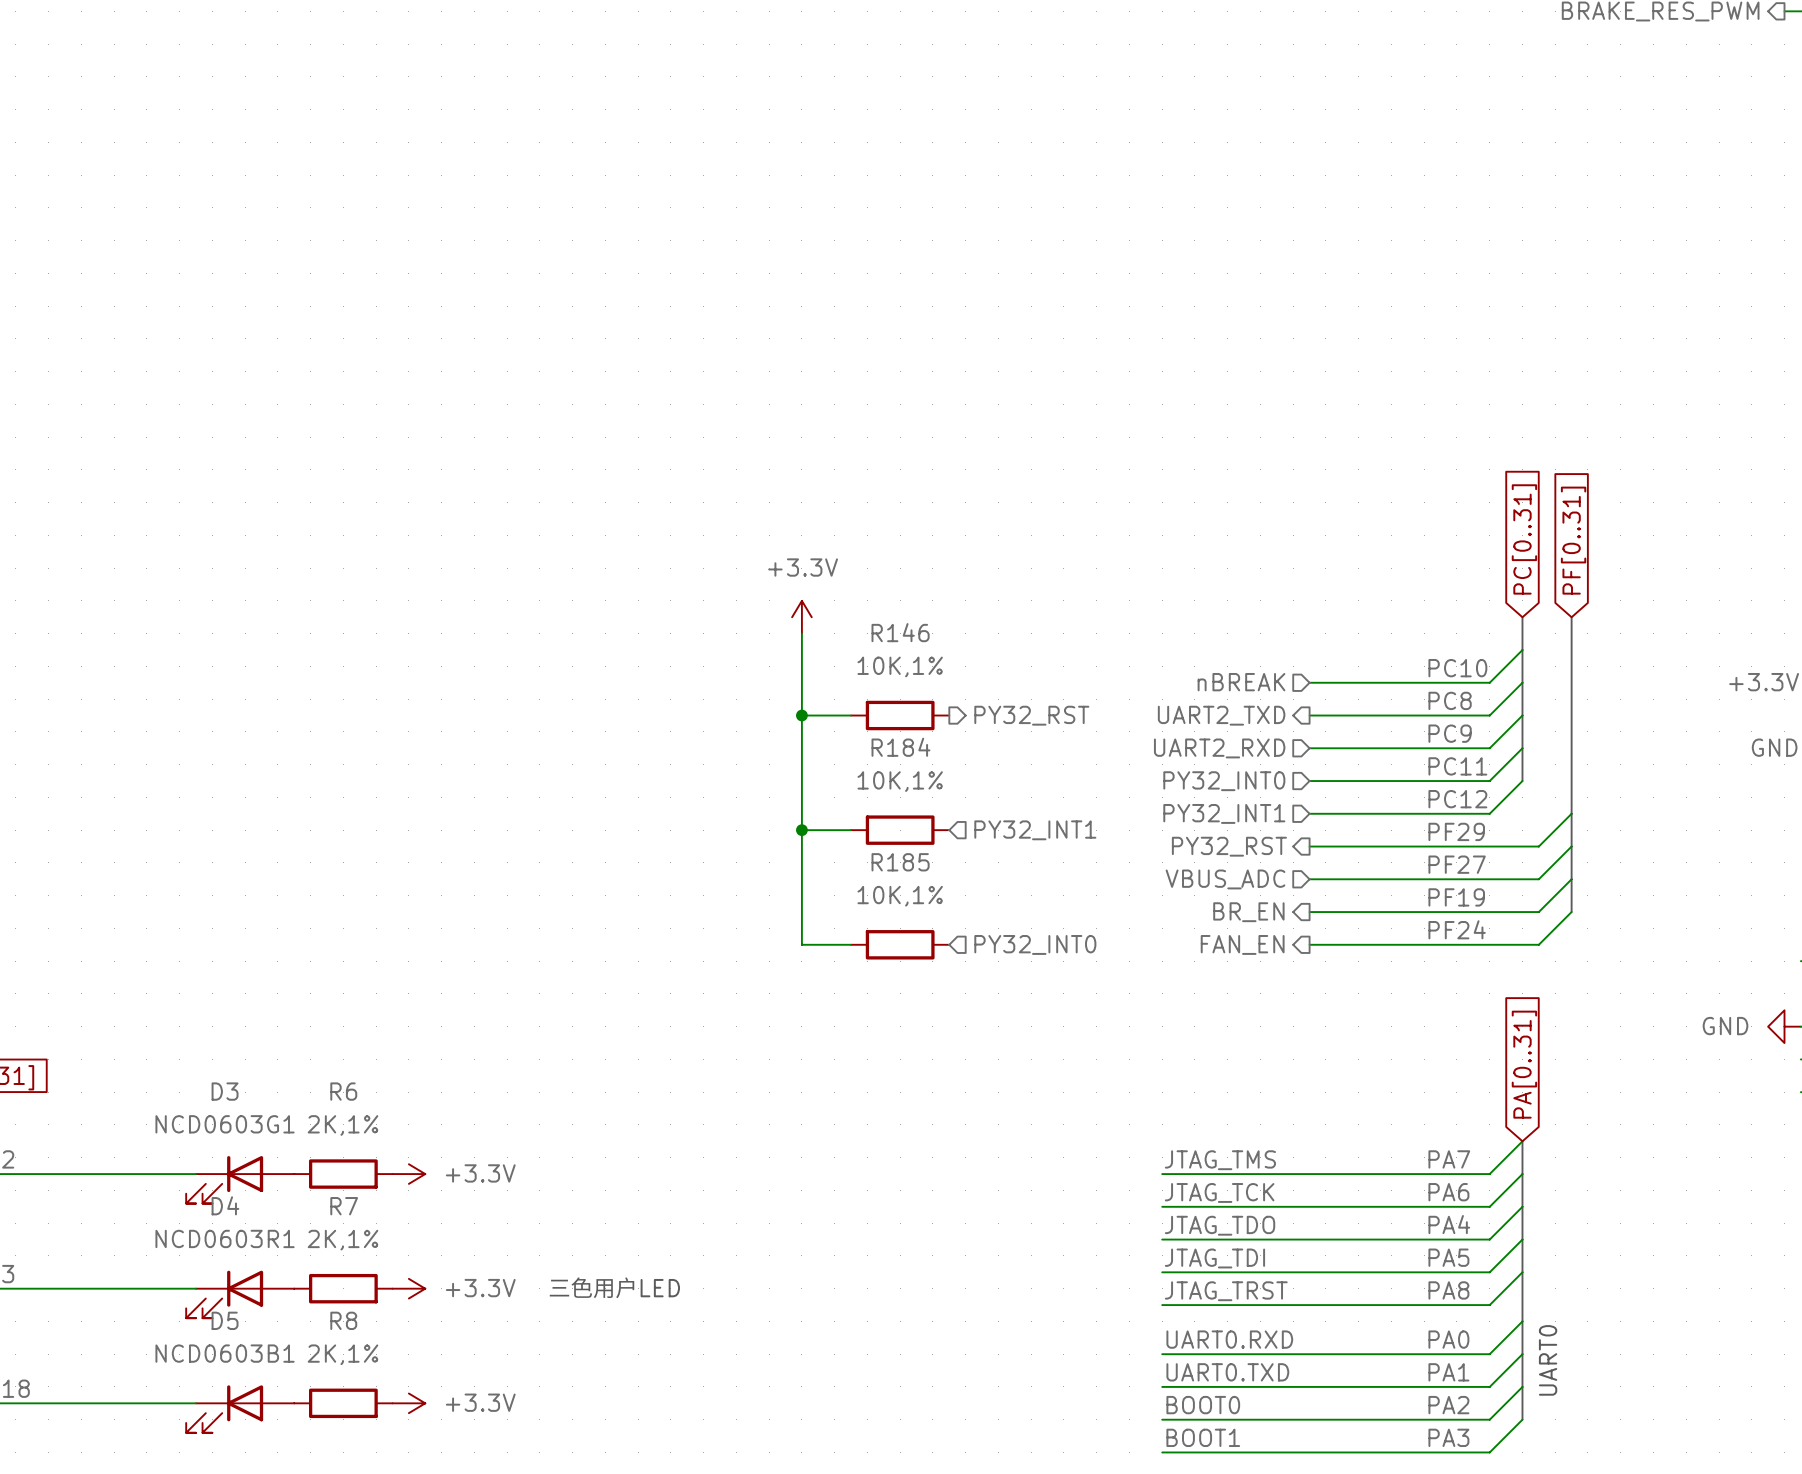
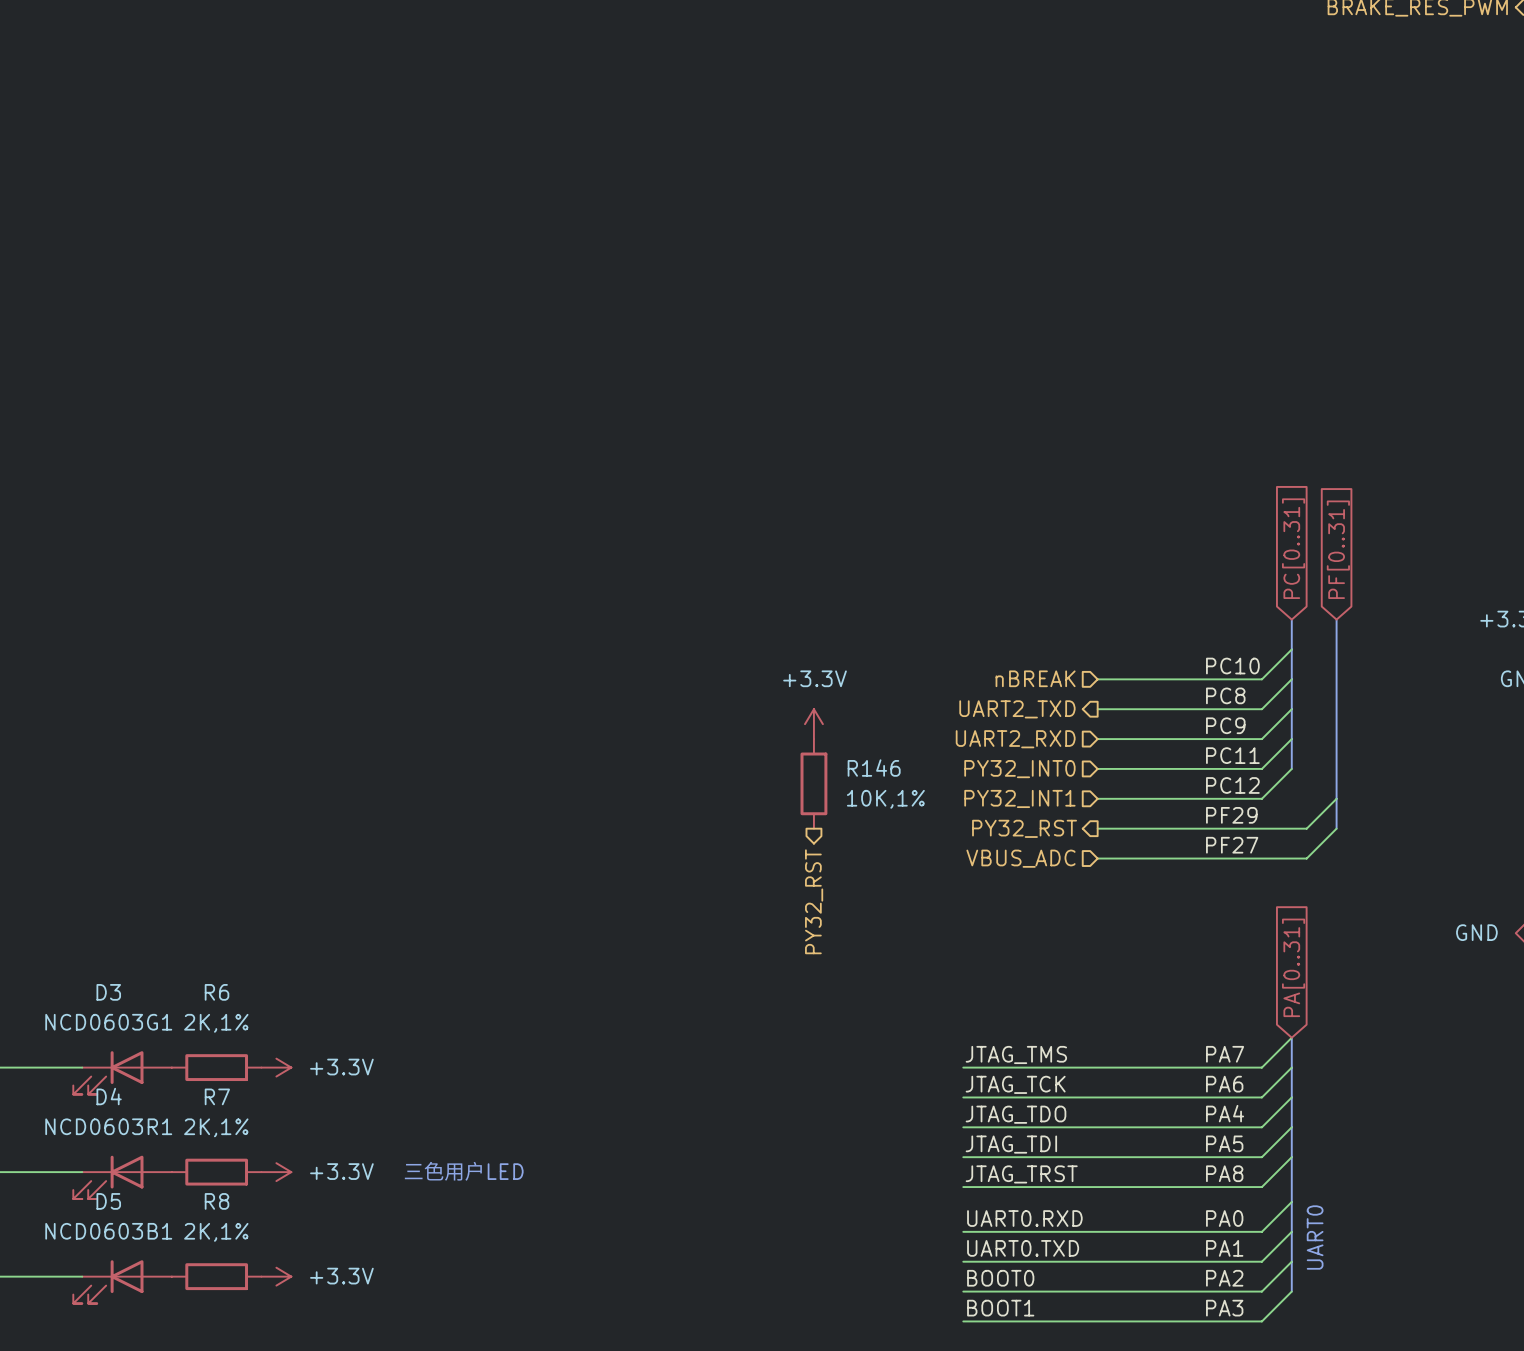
global label position: PC[0..31] (1524, 539) -> PC[0..31] (1293, 548)
global label position: PF[0..31] (1573, 540) -> PF[0..31] (1338, 549)
power symbol position: +3.3V (801, 617) -> +3.3V (813, 724)
bus: (1522, 617) (1522, 682) -> (1291, 709) (1291, 768)
bus: (1571, 617) (1571, 682) -> none
wire: (801, 633) (801, 944) (851, 944) -> none
wire: (1522, 650) (1489, 682) (1309, 682) -> none
R146 value position: 10K,1% (900, 666) -> 10K,1% (885, 799)
label: PC10 (1457, 668) -> none
hierarchical label: nBREAK (1241, 682) -> none
wire: (1522, 682) (1489, 715) (1309, 715) -> none
label: PC8 (1450, 700) -> none
wire: (801, 715) (851, 715) -> none
junction: (801, 715) -> none
R146 rotation: 0° (900, 715) -> 90° clockwise (813, 783)
R146 position: (900, 715) -> (813, 783)
hierarchical label rotation: 0° (1031, 715) -> 90° clockwise (814, 901)
hierarchical label position: PY32_RST (1031, 715) -> PY32_RST (814, 901)
hierarchical label: UART2_TXD (1221, 715) -> none
label: PC9 (1450, 733) -> PC10 (1232, 666)
hierarchical label: UART2_RXD (1219, 748) -> nBREAK (1035, 678)
label: PC11 (1457, 766) -> PC8 (1225, 695)
hierarchical label shape: input (1224, 781) -> output (1017, 709)
hierarchical label: PY32_INT0 (1224, 781) -> UART2_TXD (1017, 709)
label: PC12 (1457, 799) -> PC9 (1225, 725)
hierarchical label: PY32_INT1 (1224, 813) -> UART2_RXD (1015, 739)
wire: (1571, 813) (1538, 846) (1489, 846) -> (1291, 739) (1261, 768)
wire: (801, 830) (851, 830) -> none
junction: (801, 830) -> none
R184: 10K,1% (900, 830) -> none
hierarchical label: PY32_INT1 (1035, 830) -> none
label: PF29 (1456, 831) -> PC11 (1232, 755)
hierarchical label shape: output (1229, 846) -> input (1019, 769)
hierarchical label: PY32_RST (1229, 846) -> PY32_INT0 (1019, 769)
wire: (1571, 846) (1538, 879) (1489, 879) -> (1291, 768) (1261, 798)
label: PF27 (1457, 864) -> PC12 (1232, 785)
hierarchical label: VBUS_ADC (1225, 879) -> PY32_INT1 (1019, 798)
label: PF19 (1456, 897) -> PF29 (1231, 815)
hierarchical label: BR_EN (1248, 912) -> PY32_RST (1024, 828)
label: PF24 (1457, 929) -> PF27 (1232, 845)
R185: 10K,1% (900, 944) -> none
hierarchical label: PY32_INT0 (1035, 944) -> none
hierarchical label shape: output (1242, 944) -> input (1020, 858)
hierarchical label: FAN_EN (1242, 944) -> VBUS_ADC (1020, 858)

